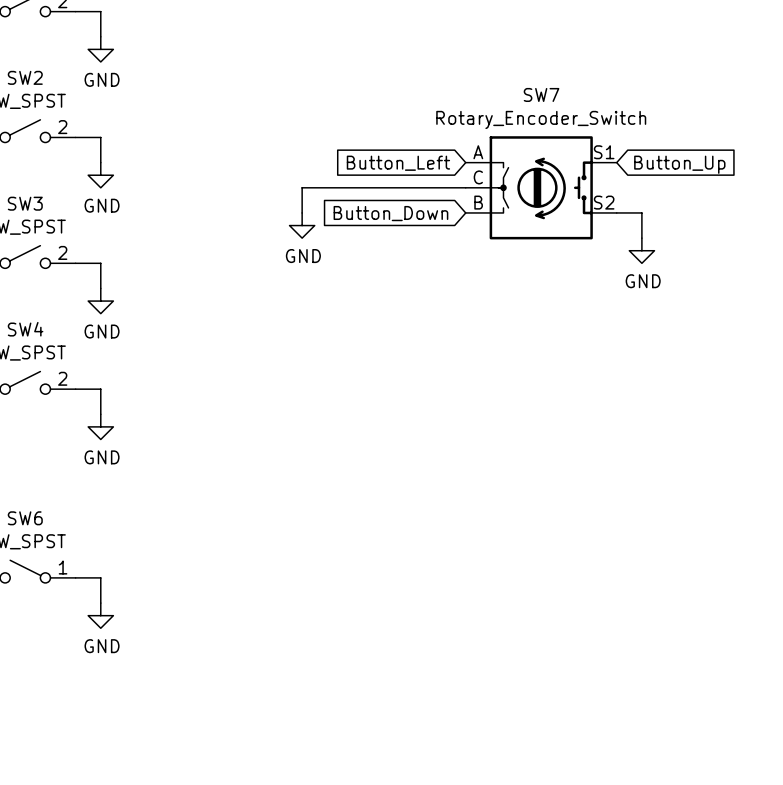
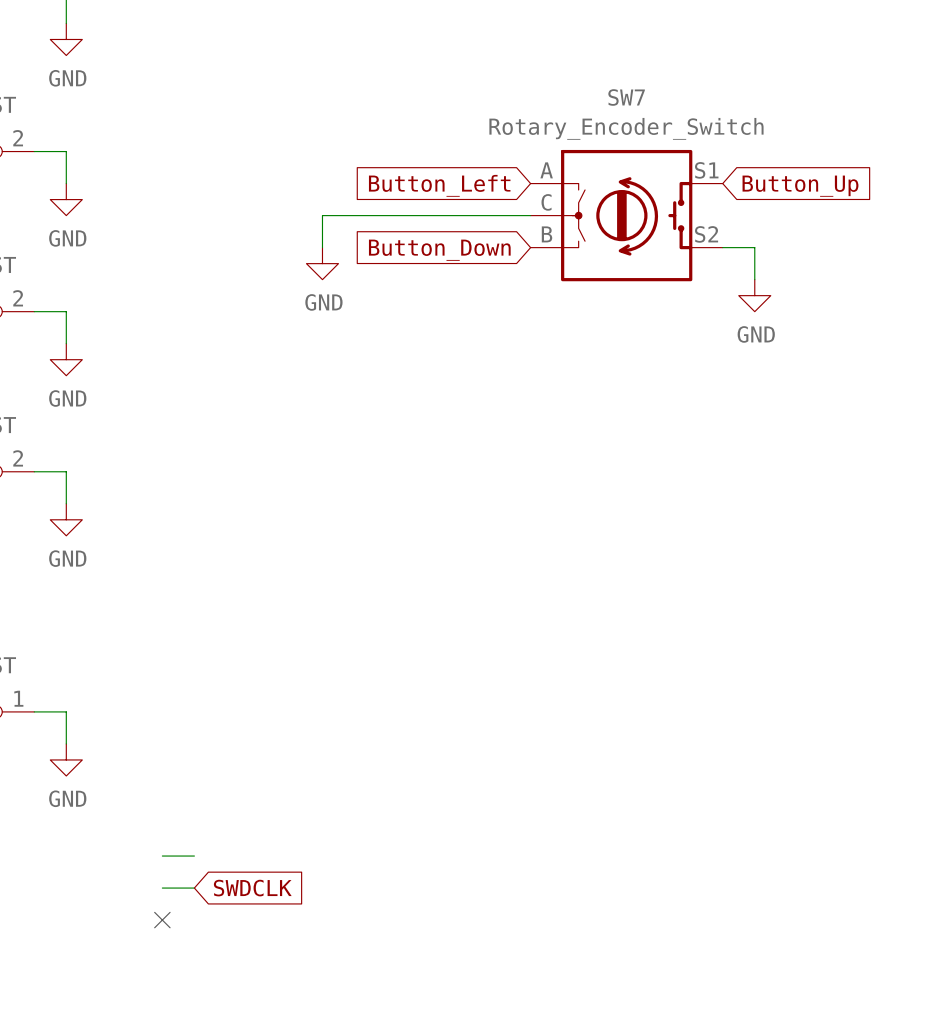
wire: none -> (162, 856) (194, 856)
wire: none -> (162, 888) (194, 888)
global label: none -> SWDCLK (252, 888)
no-connect mark: none -> (162, 920)

